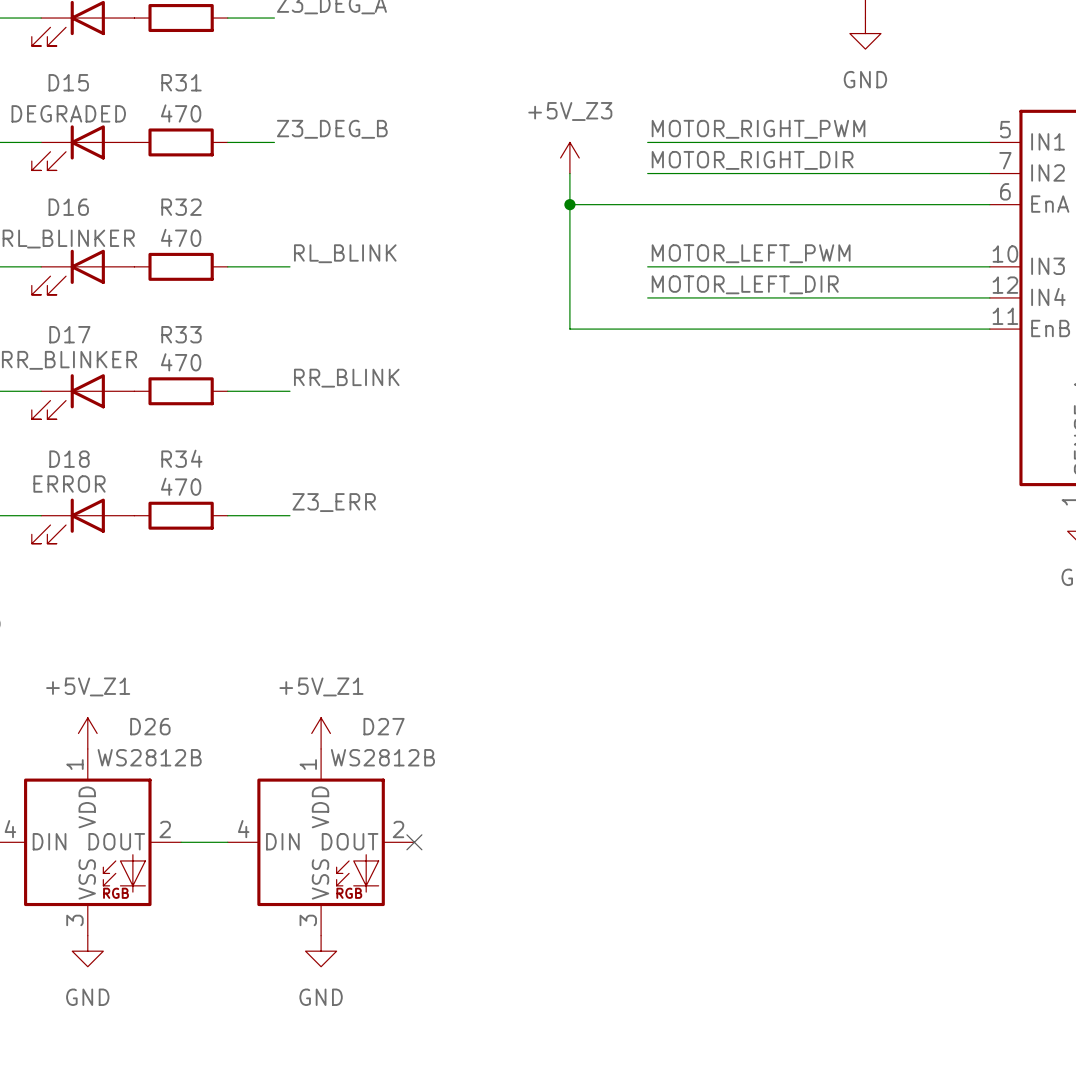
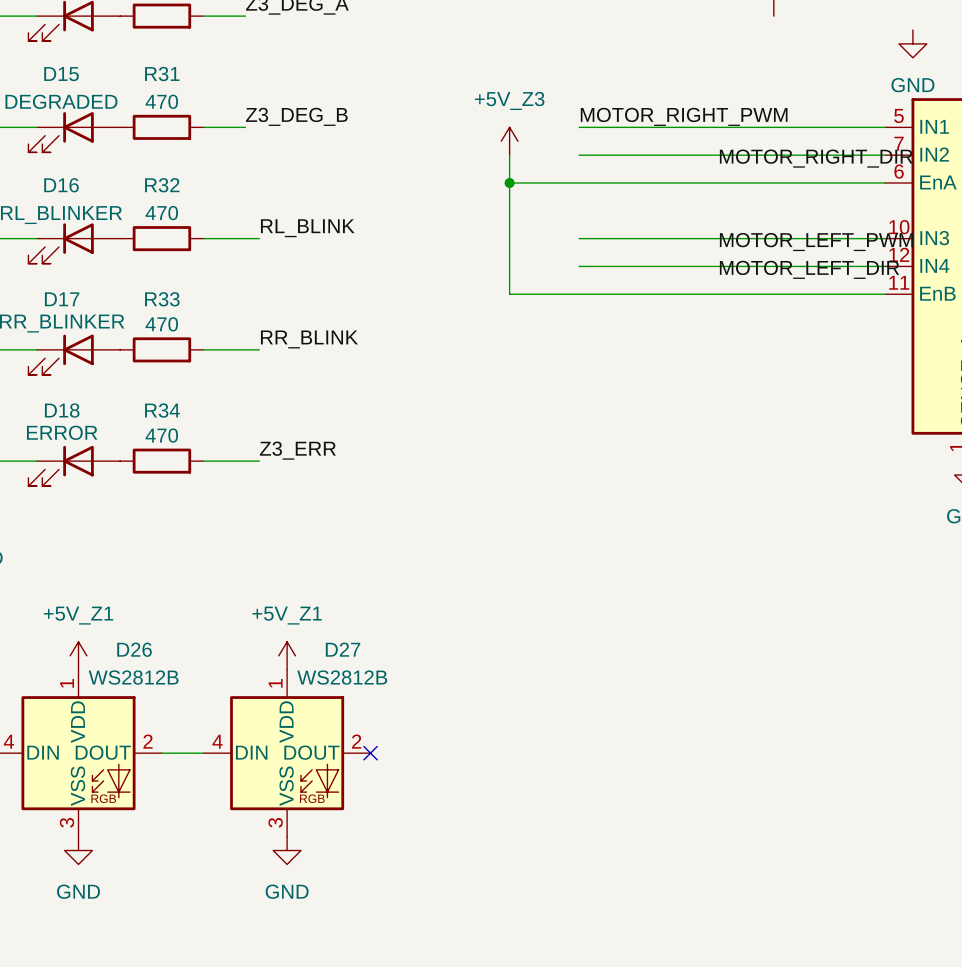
power symbol position: GND (865, 33) -> GND (912, 43)
label position: MOTOR_RIGHT_DIR (752, 160) -> MOTOR_RIGHT_DIR (816, 158)
label position: MOTOR_LEFT_PWM (751, 253) -> MOTOR_LEFT_PWM (816, 242)
label position: MOTOR_LEFT_DIR (745, 284) -> MOTOR_LEFT_DIR (809, 269)

